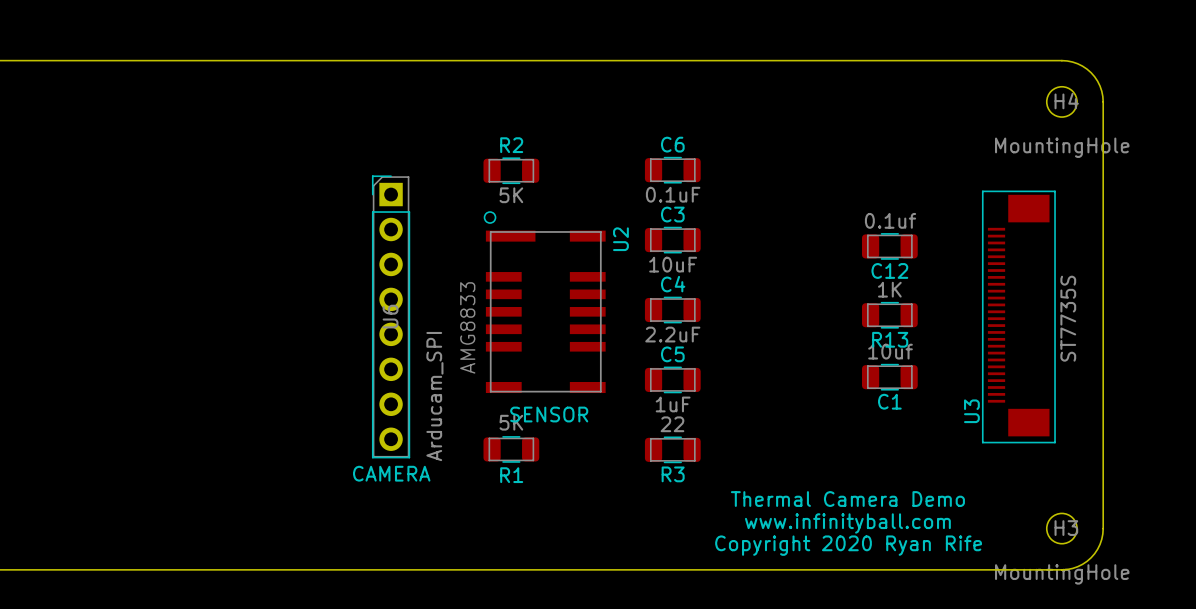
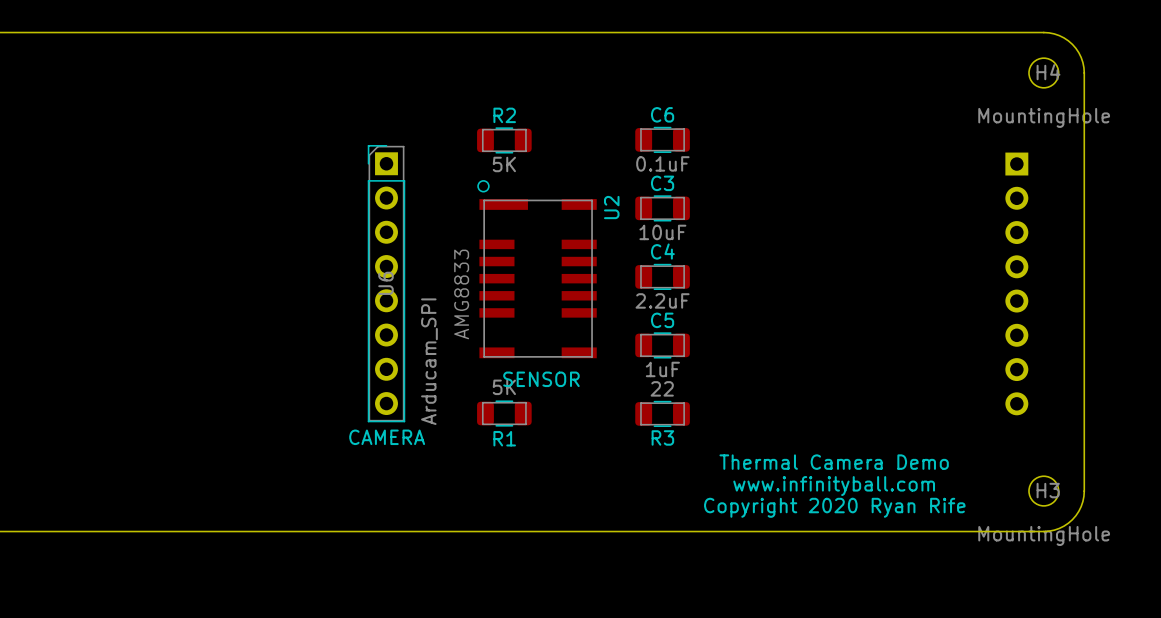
C12: 0.1uf (889, 246) -> none
R13: 1K (889, 315) -> none
U3: ST7735S (1018, 316) -> none
part: none -> (1016, 283)
C1: 10uf (889, 377) -> none

